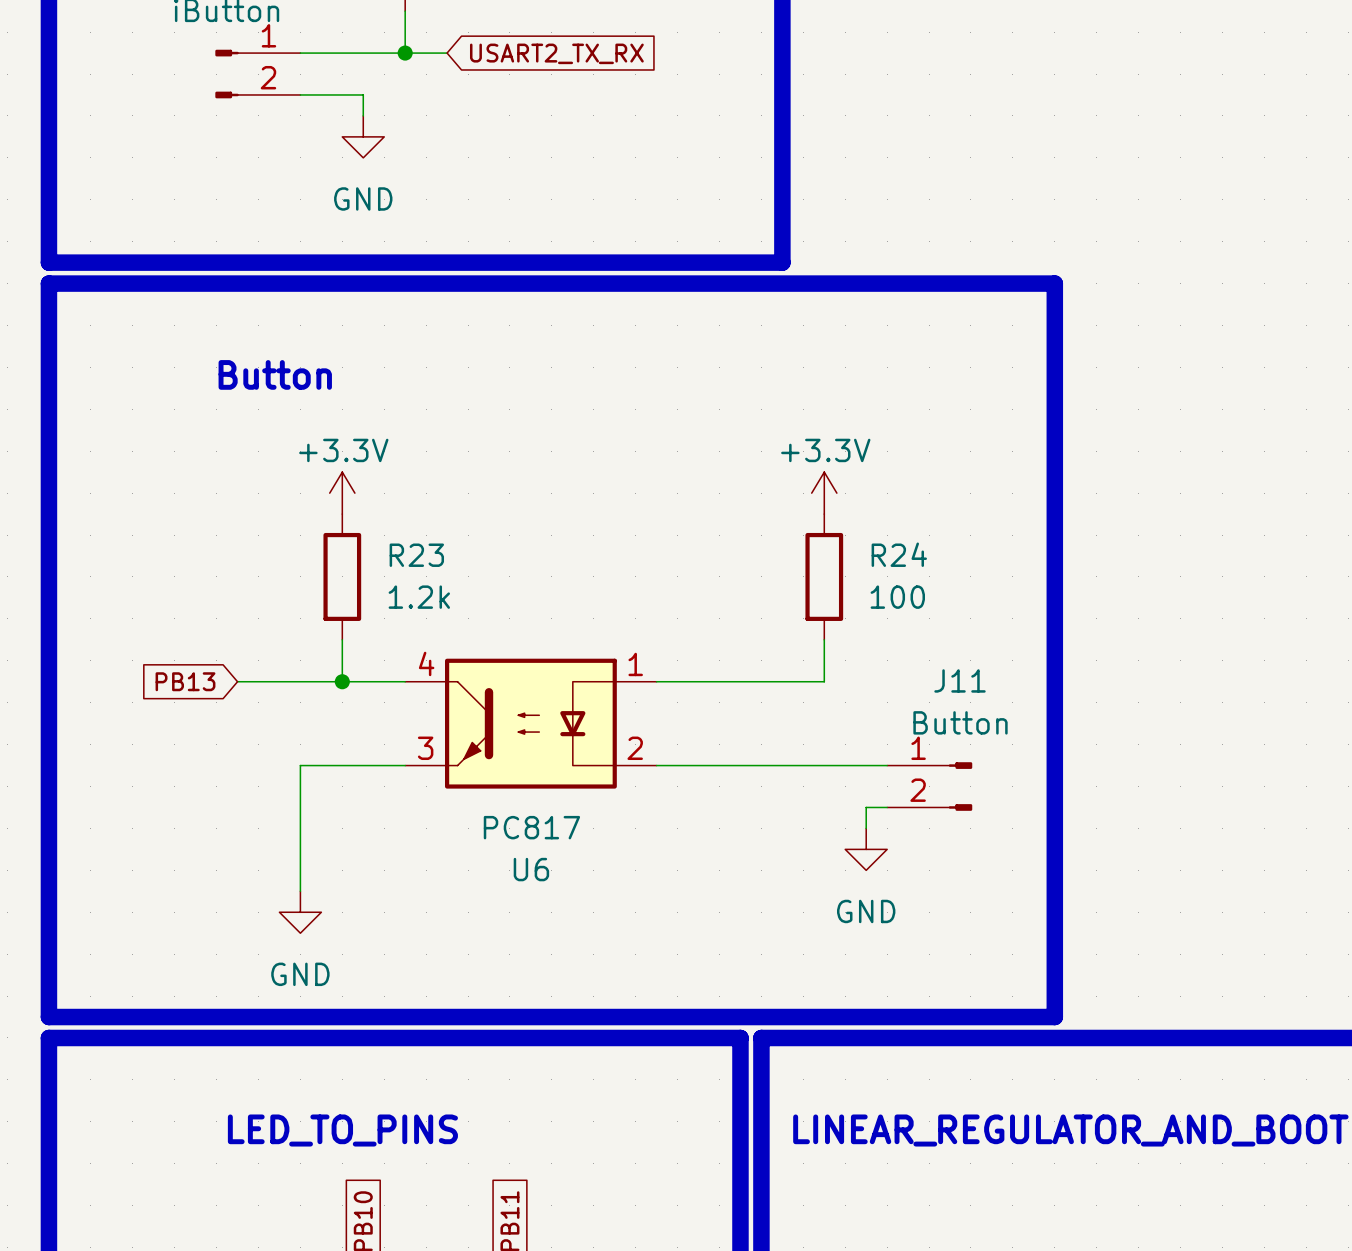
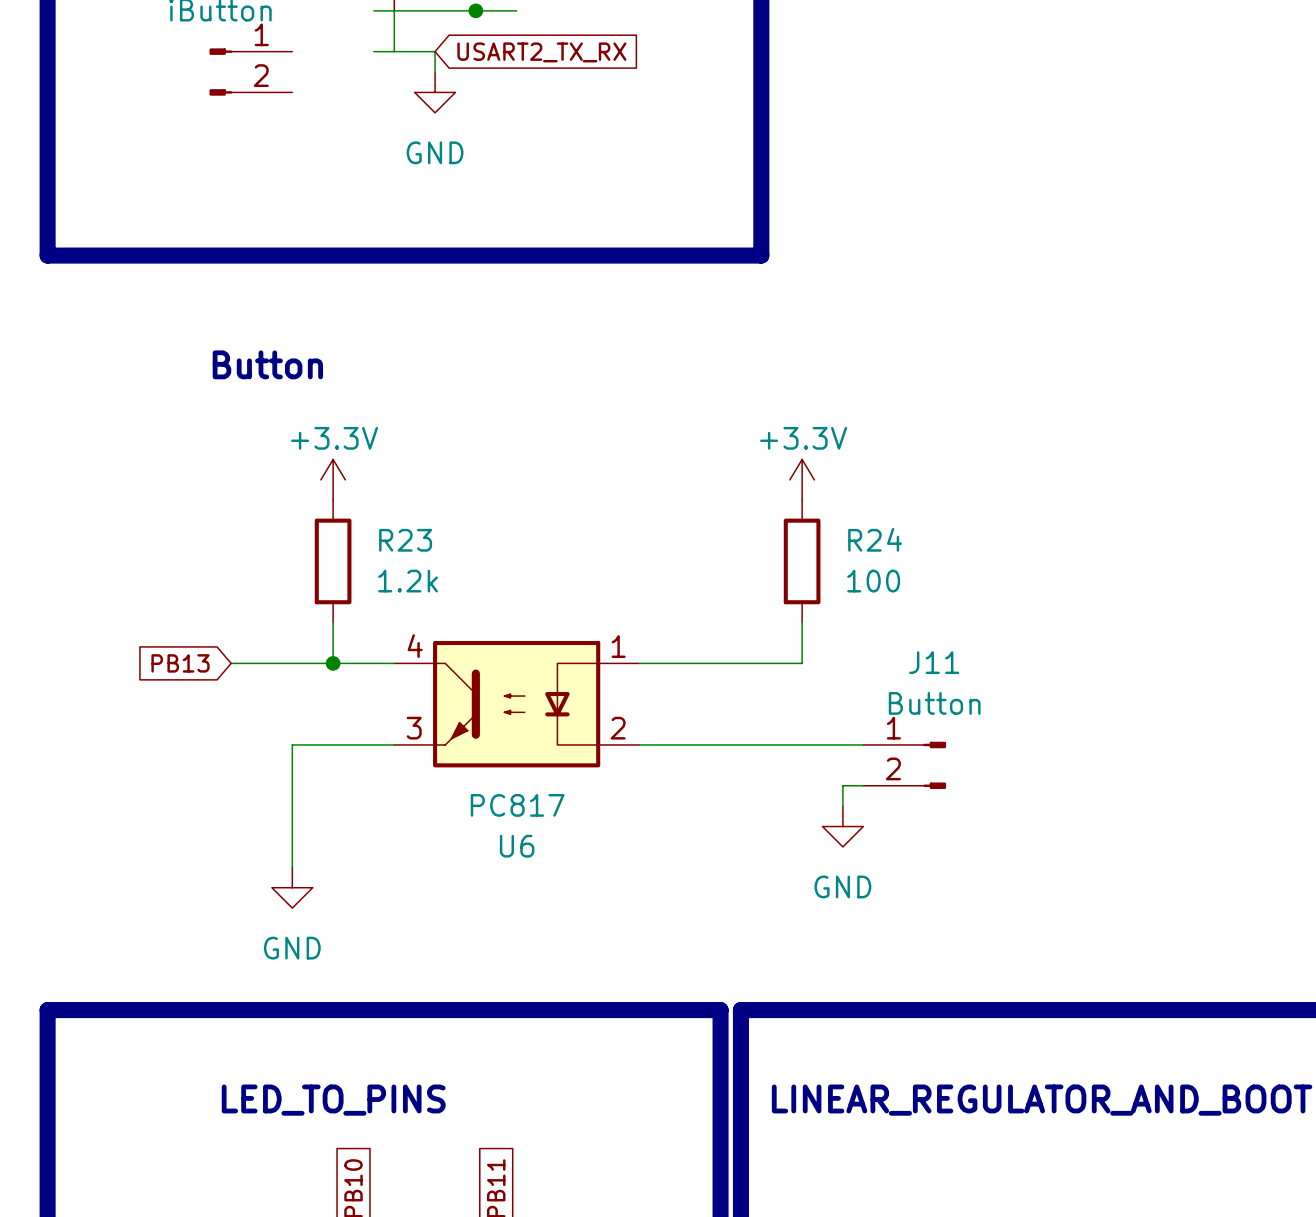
wire: none -> (373, 10) (516, 10)
wire: (300, 53) (384, 53) -> none
junction position: (405, 53) -> (475, 10)
wire: none -> (435, 51) (435, 72)
wire: (300, 94) (363, 94) (363, 115) -> none
power symbol position: GND (363, 136) -> GND (435, 92)
line: (48, 283) (1054, 283) (1054, 1017) (48, 1017) (48, 283) -> none

